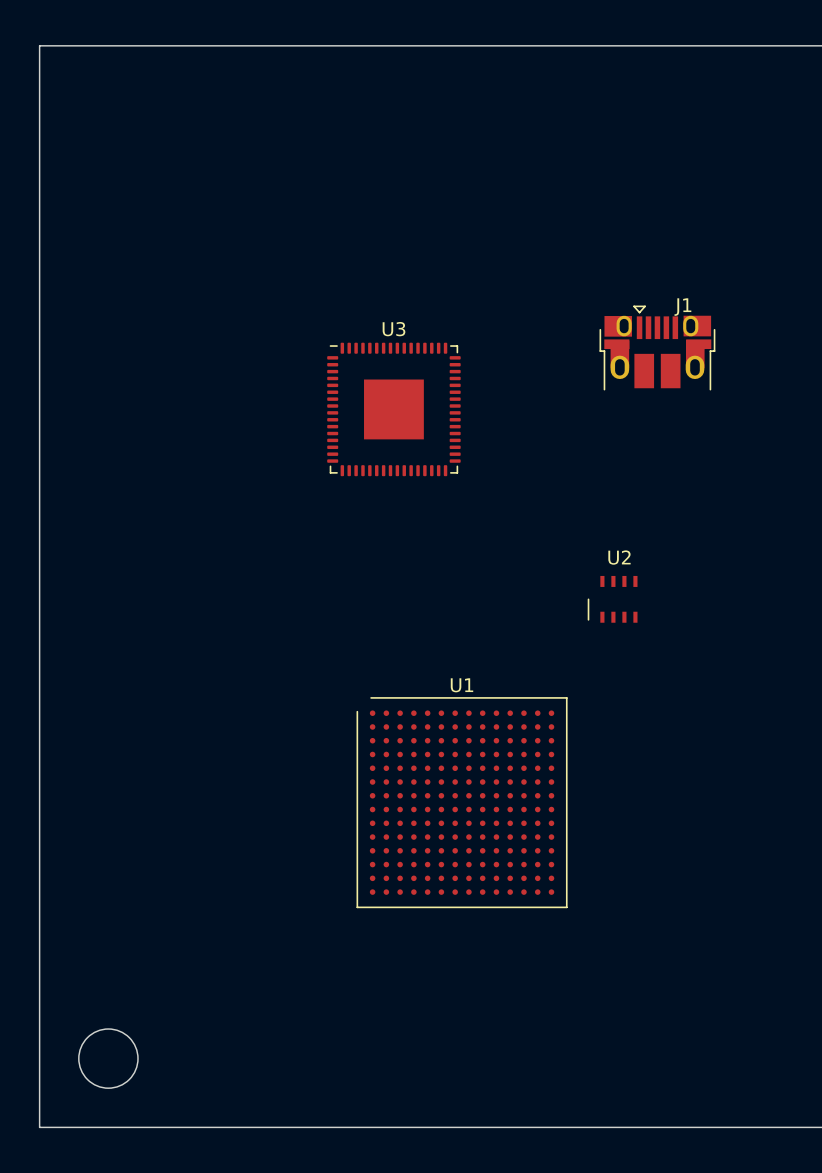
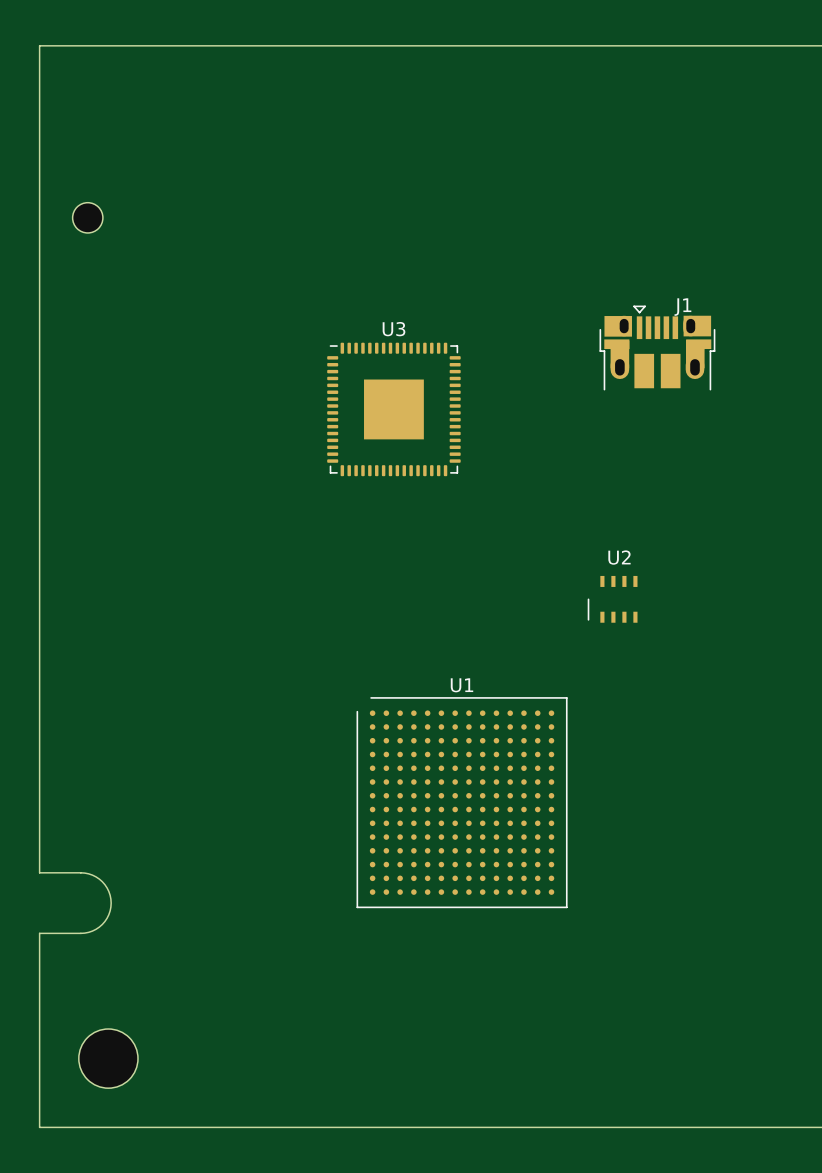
part: none -> (87, 217)
board edge: (39, 872) (39, 933) -> (39, 872) (80, 872) (92, 875) (104, 884) (108, 891) (111, 903) (108, 914) (104, 921) (92, 931) (80, 933) (39, 933)

